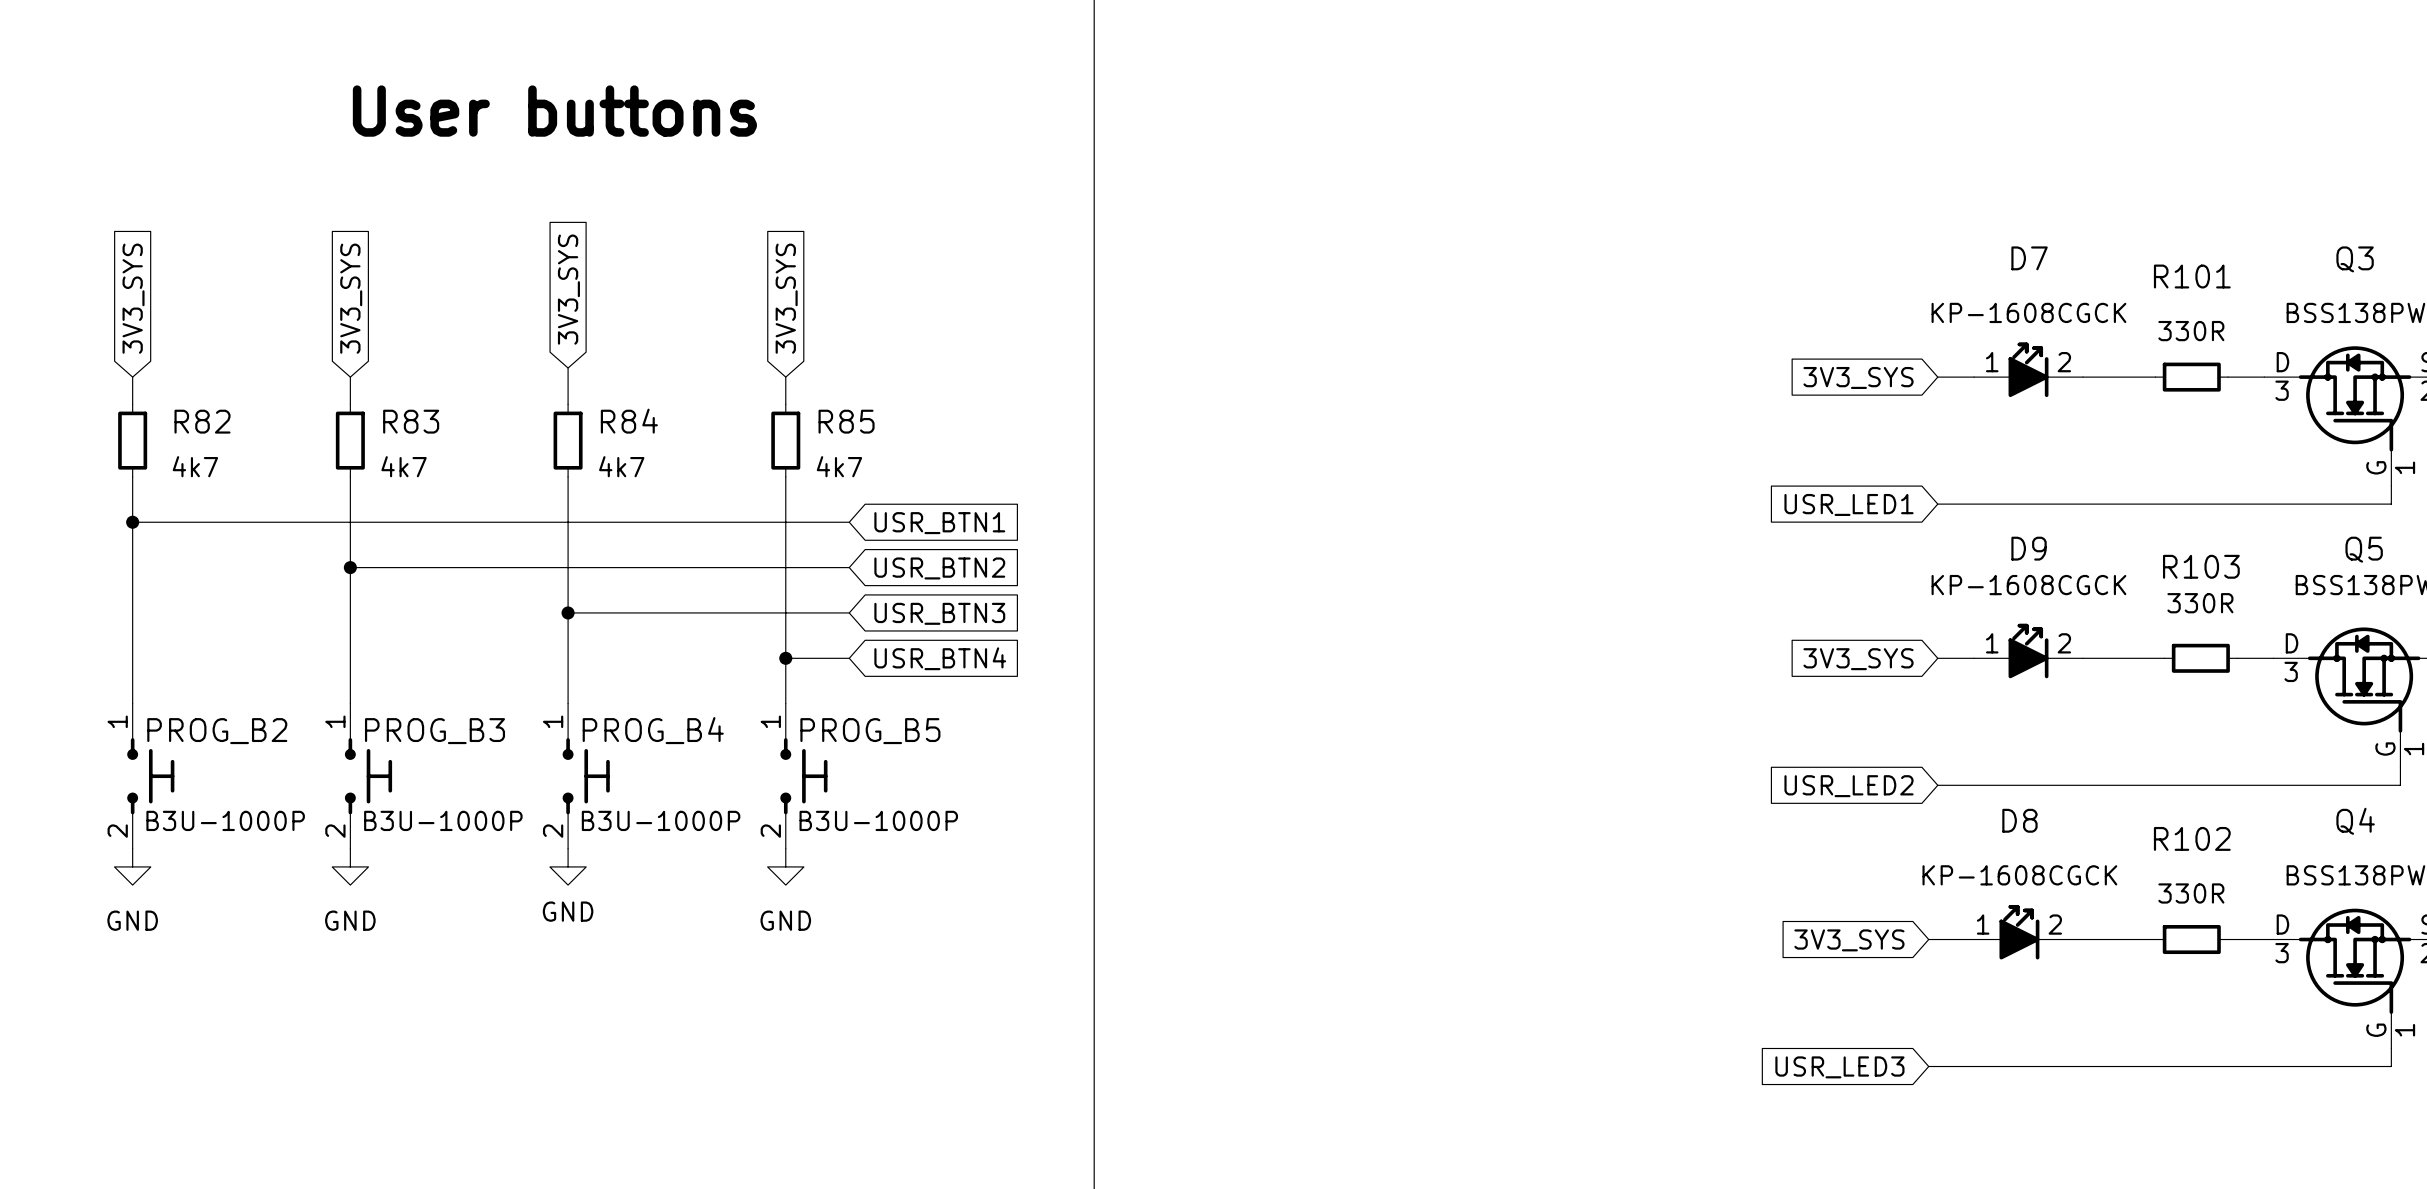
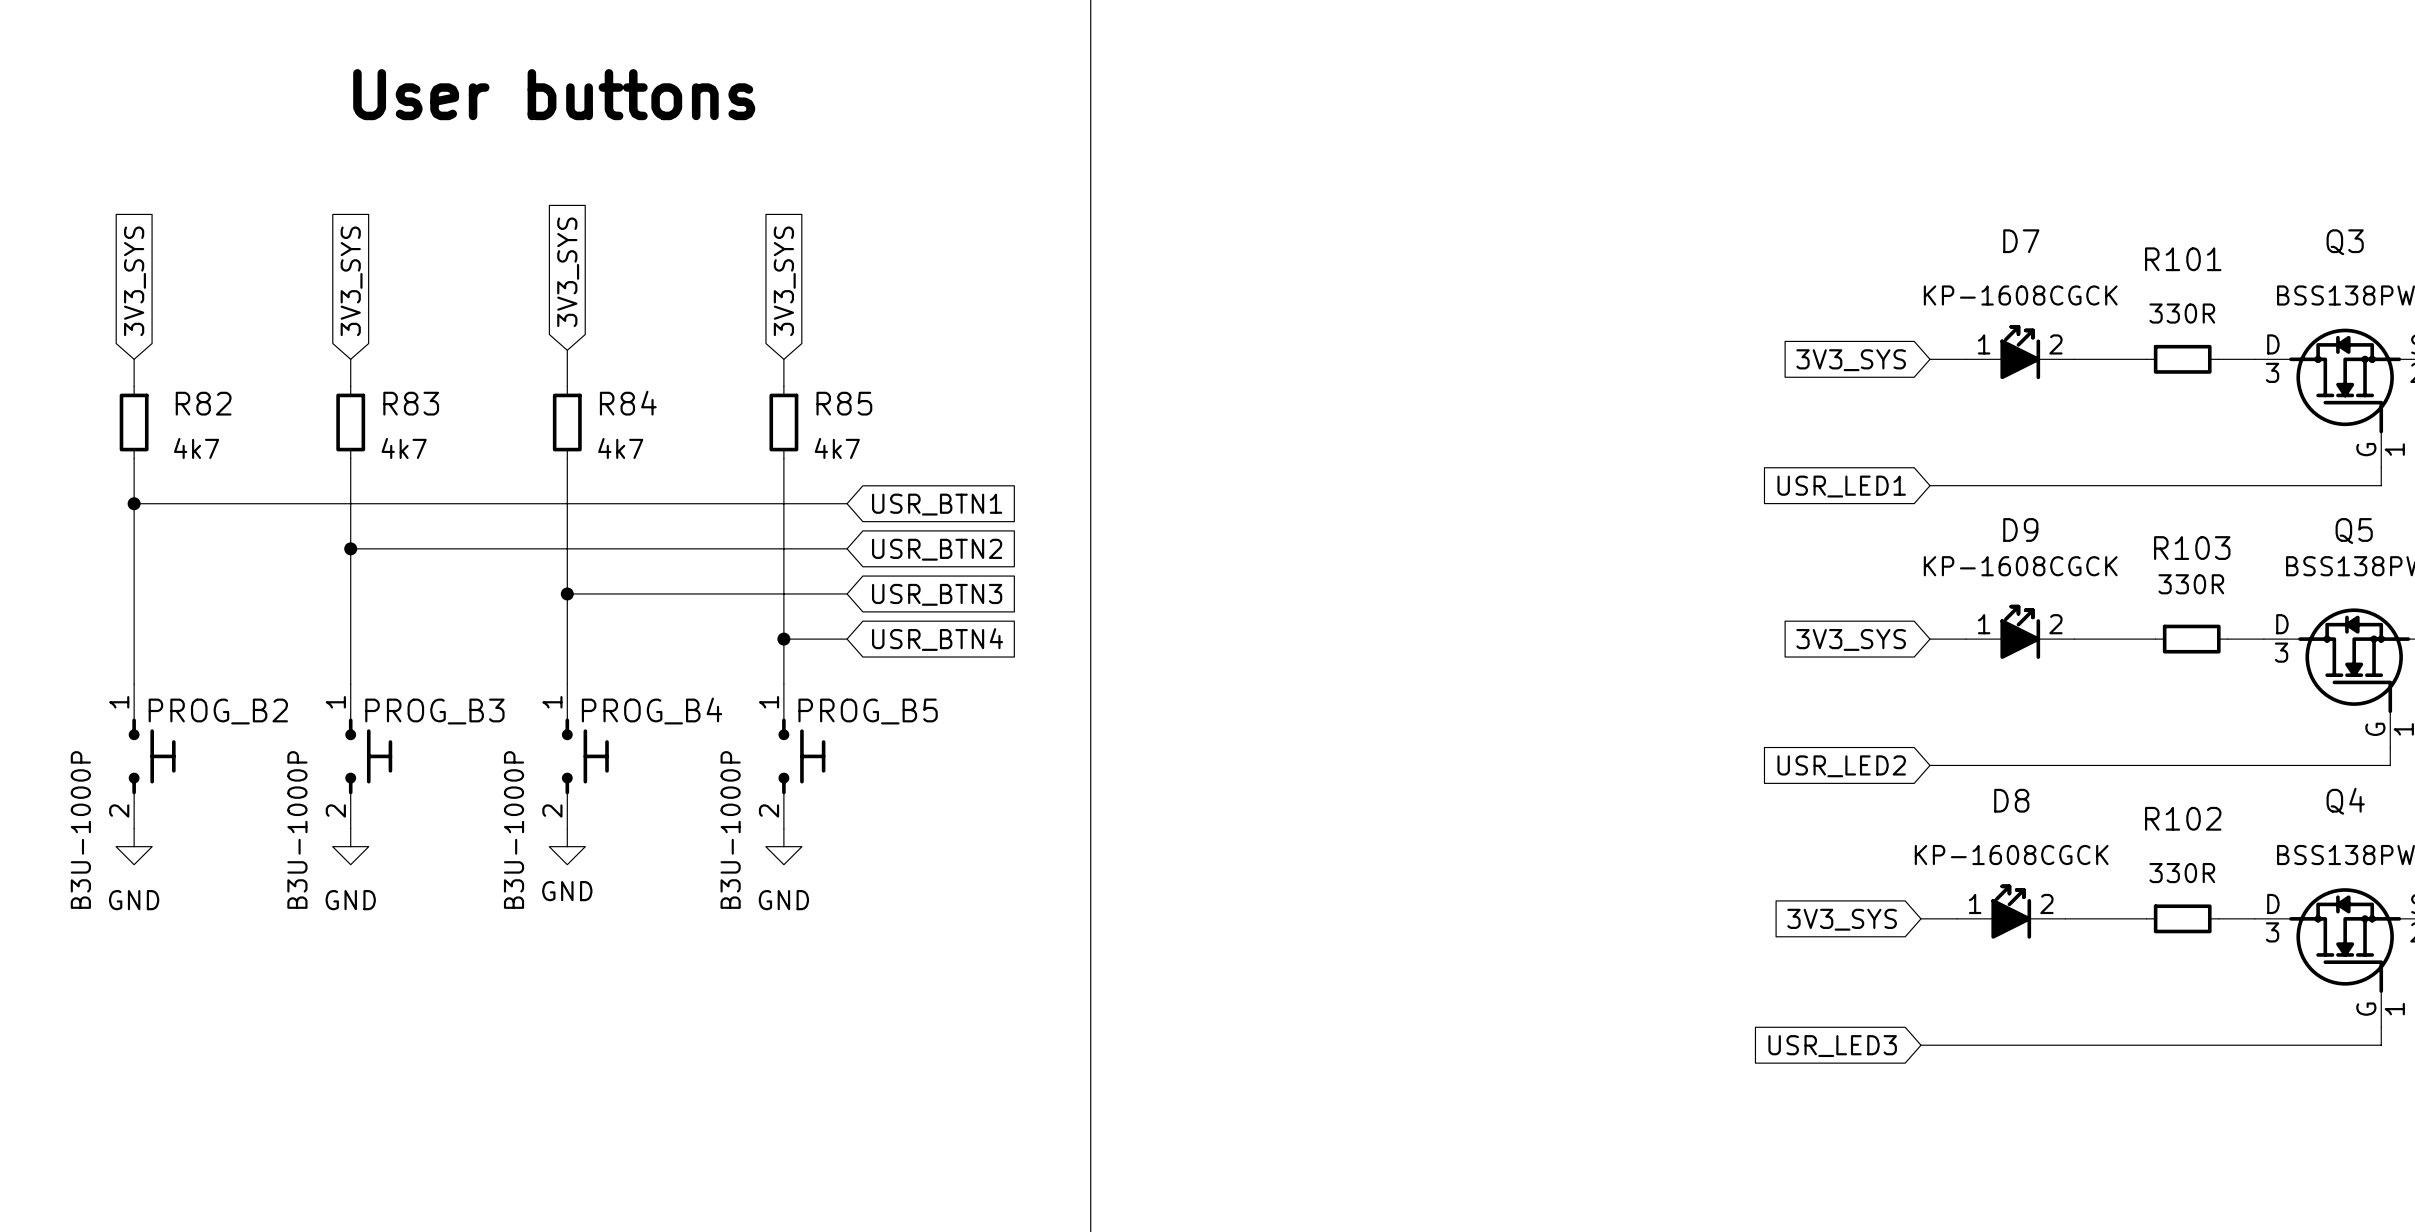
PROG_B2 text rotation: 0° (225, 820) -> 90° counterclockwise (80, 830)
PROG_B3 text rotation: 0° (443, 820) -> 90° counterclockwise (297, 830)
PROG_B4 text rotation: 0° (661, 820) -> 90° counterclockwise (514, 830)
PROG_B5 text rotation: 0° (878, 820) -> 90° counterclockwise (730, 830)

